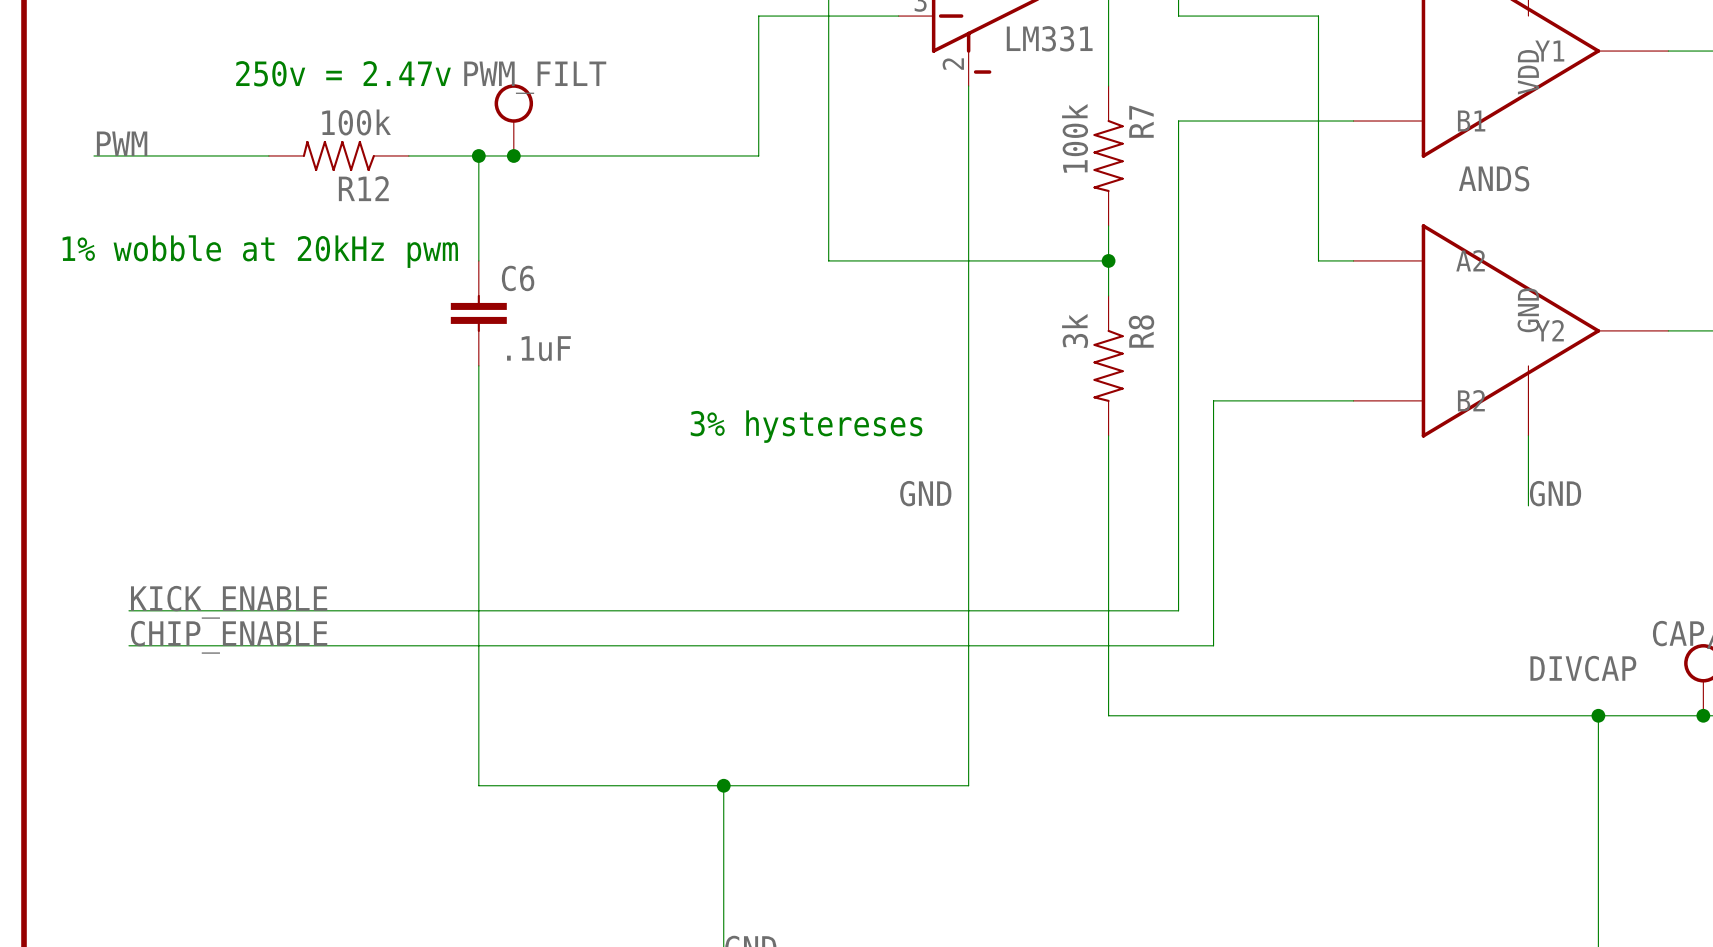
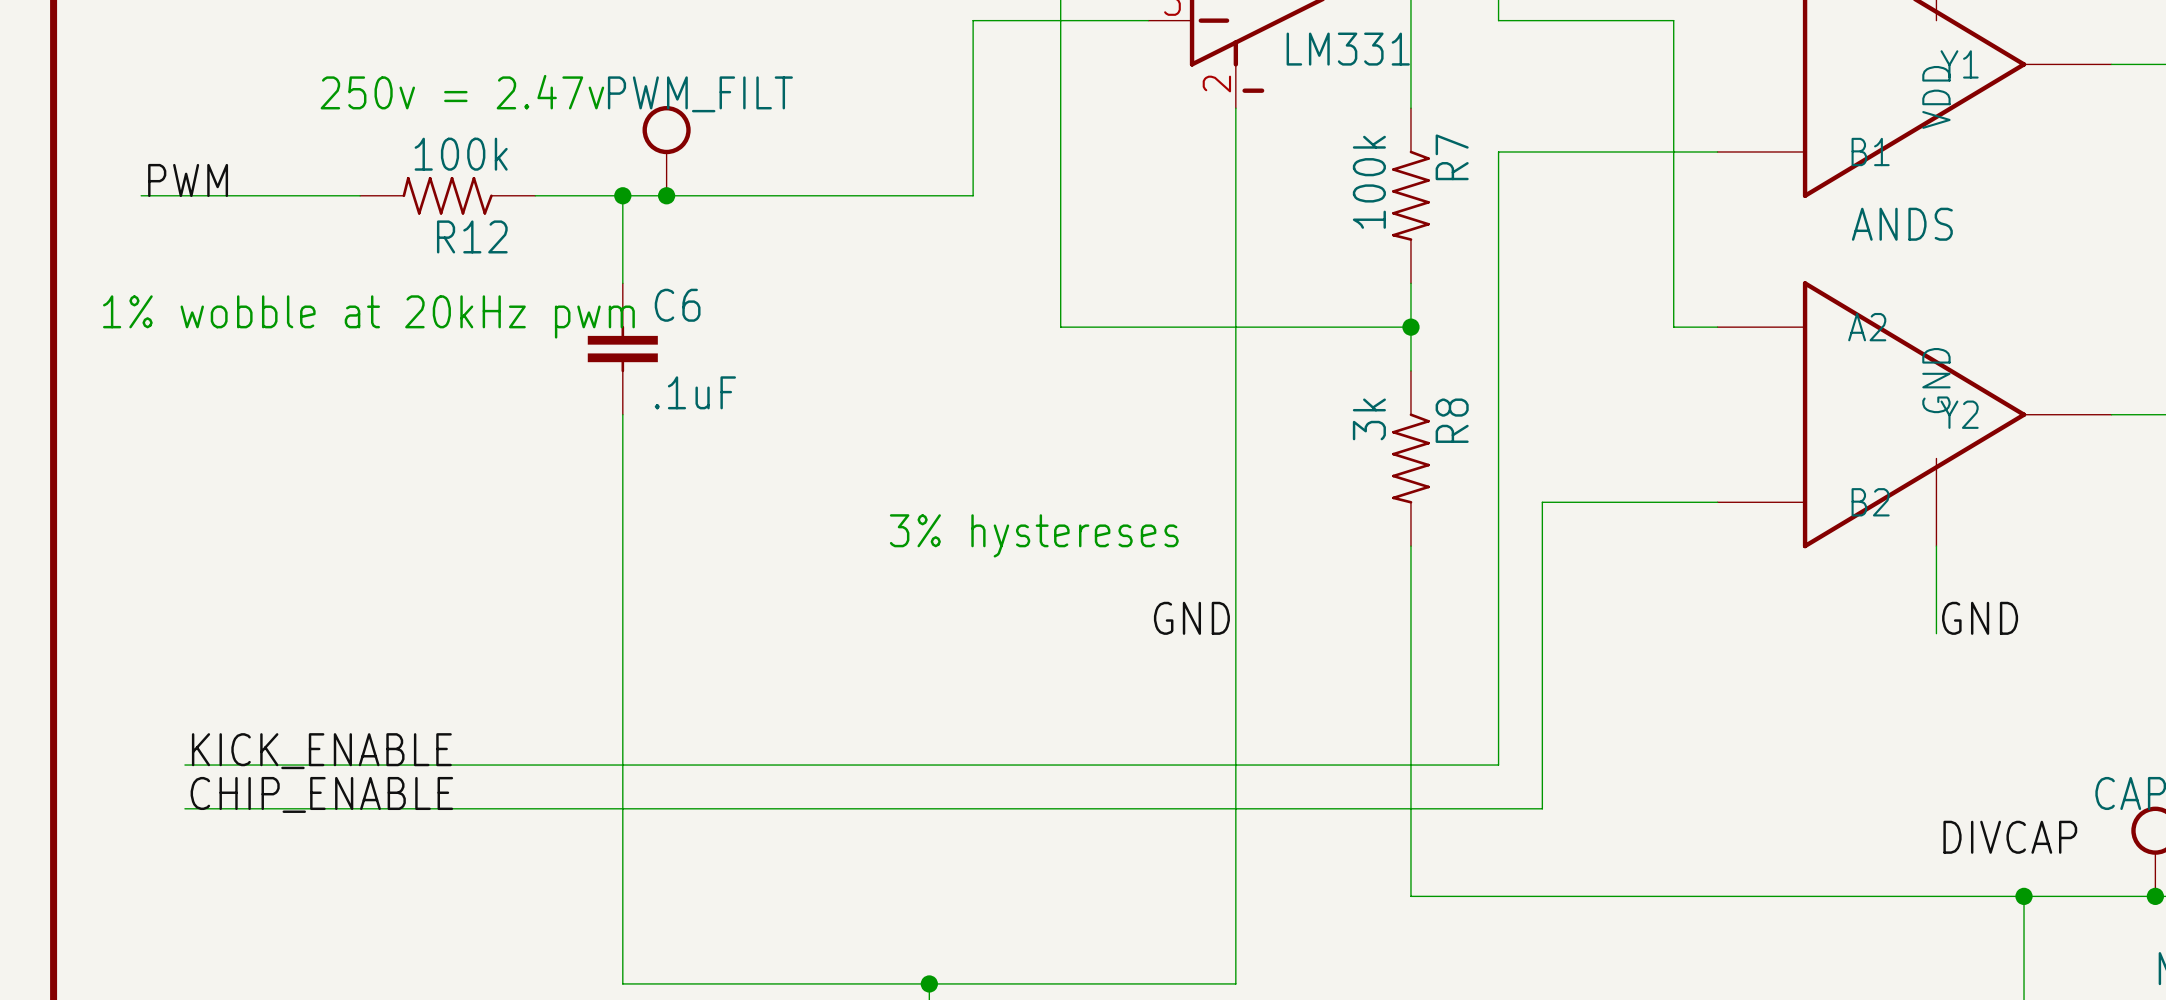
C6 position: (478, 313) -> (622, 349)

